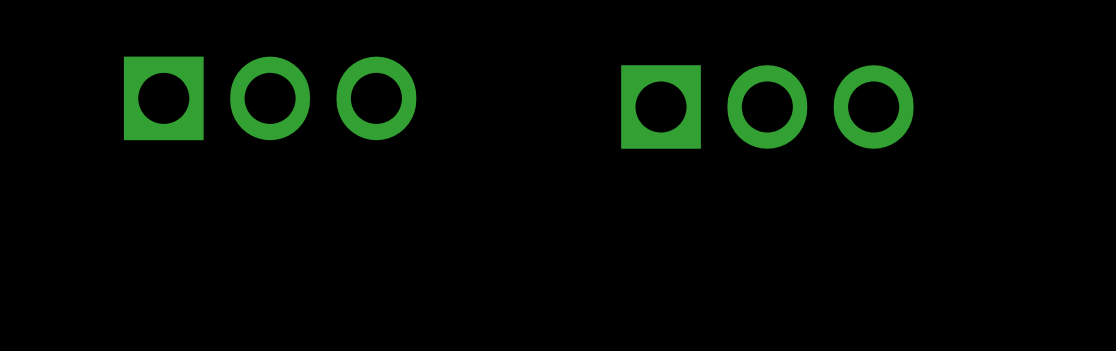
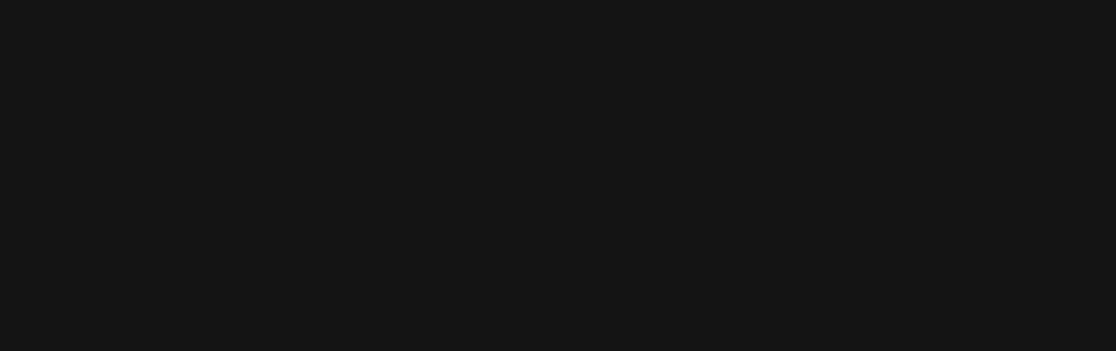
part: (270, 98) -> none
part: (767, 106) -> none

